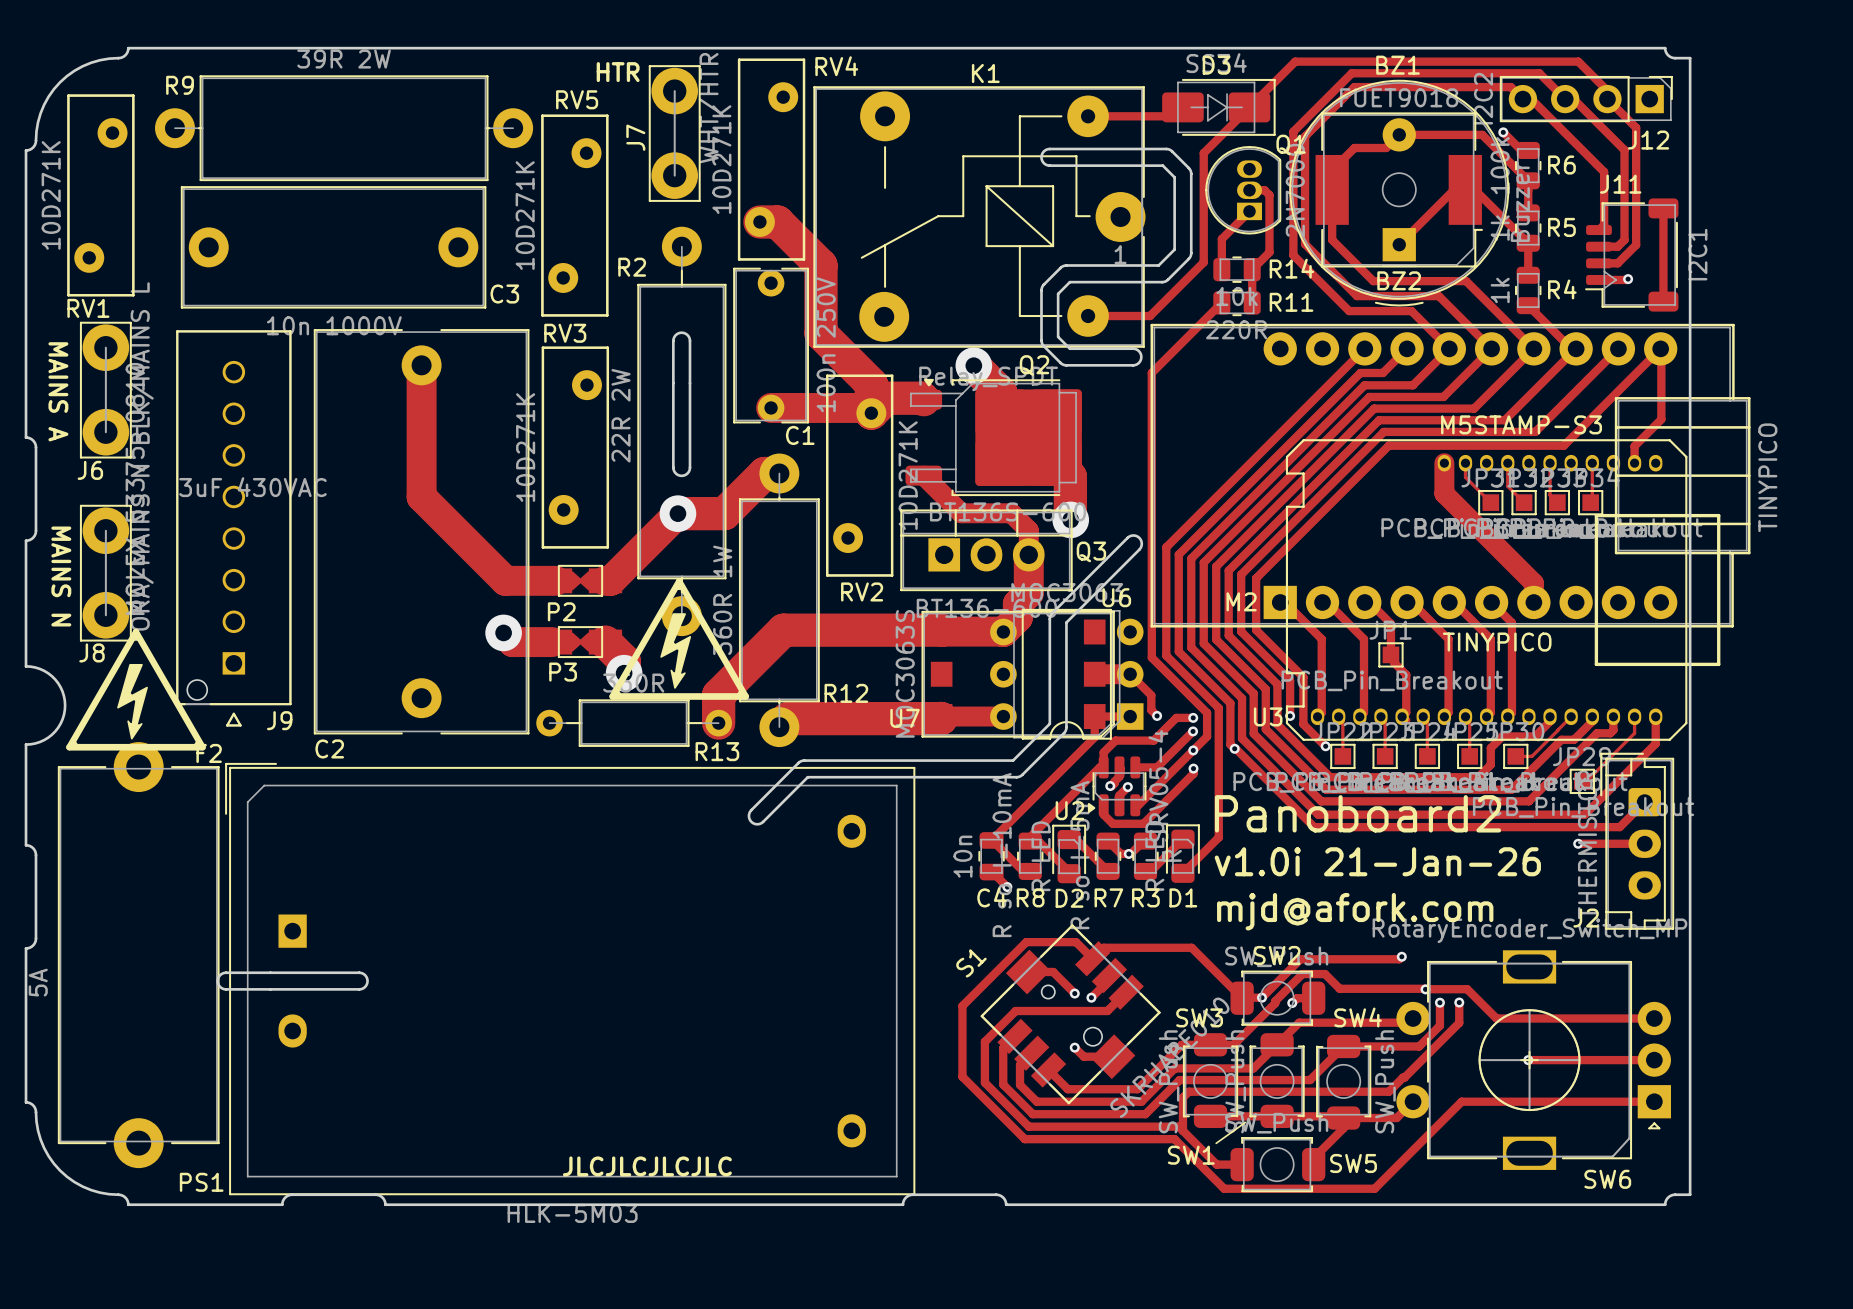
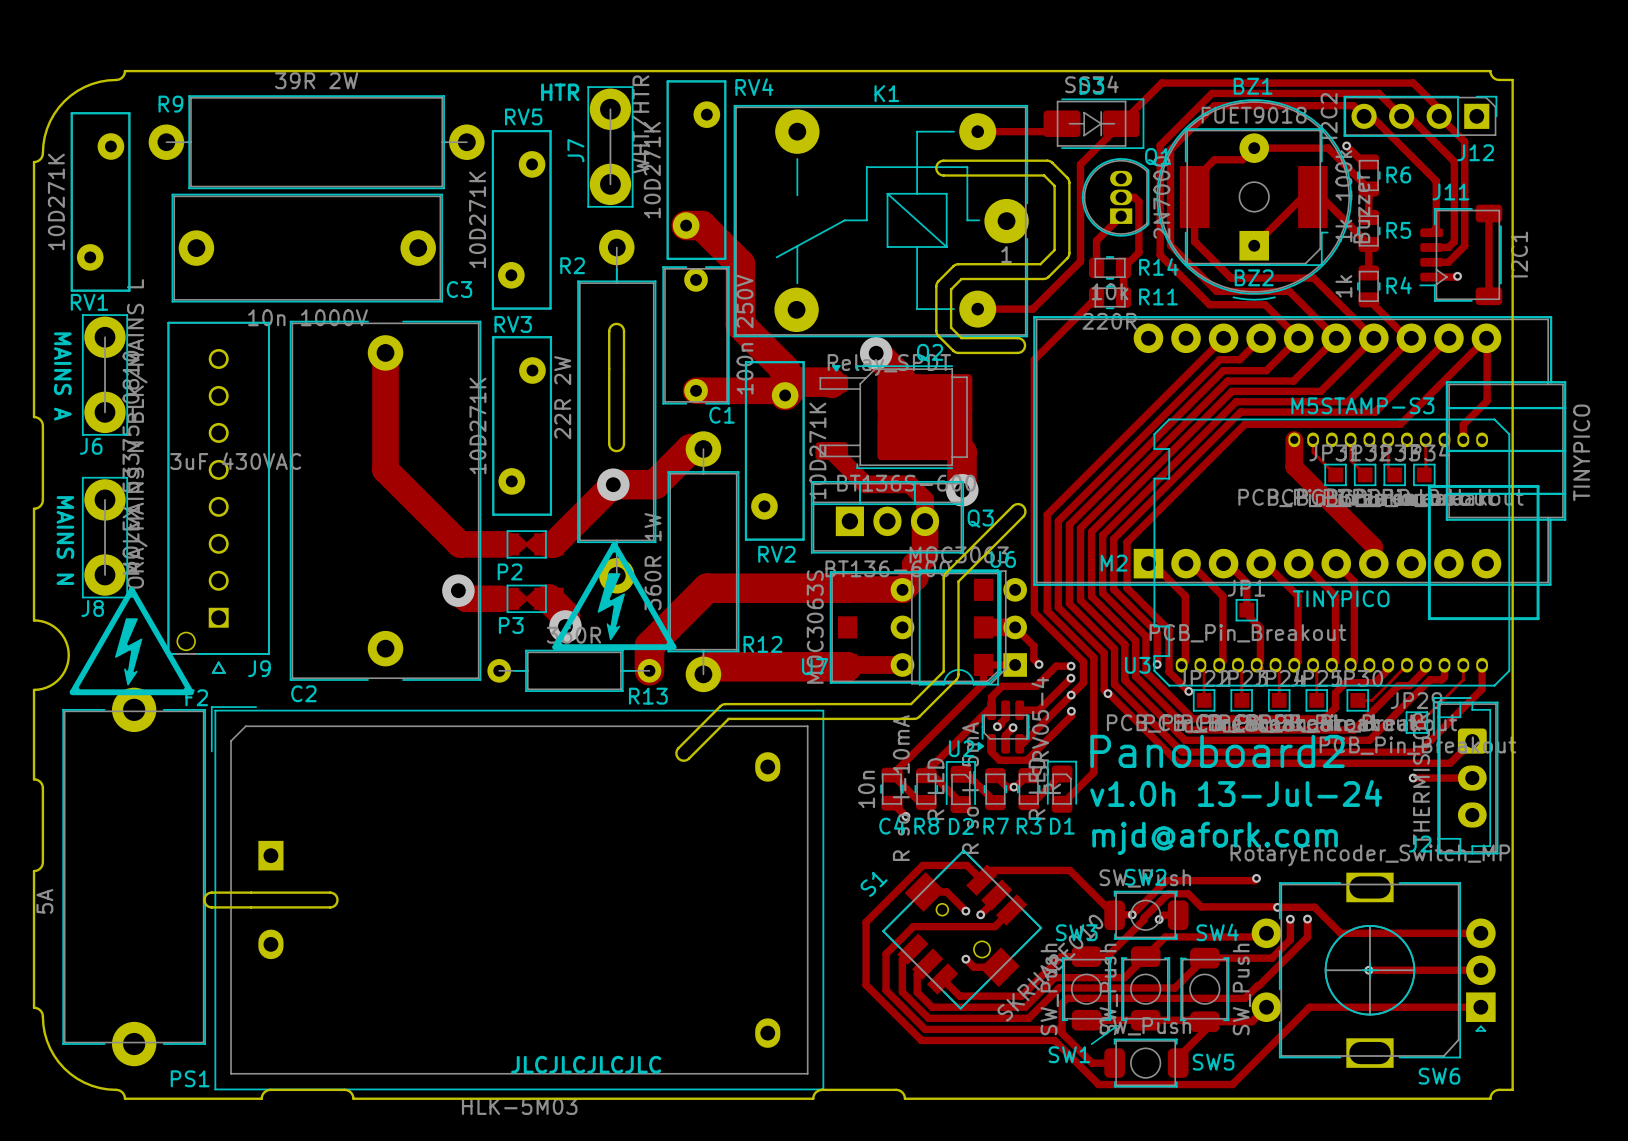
text: v1.0i 21-Jan-26 (1377, 861) -> v1.0h 13-Jul-24 (1236, 793)

